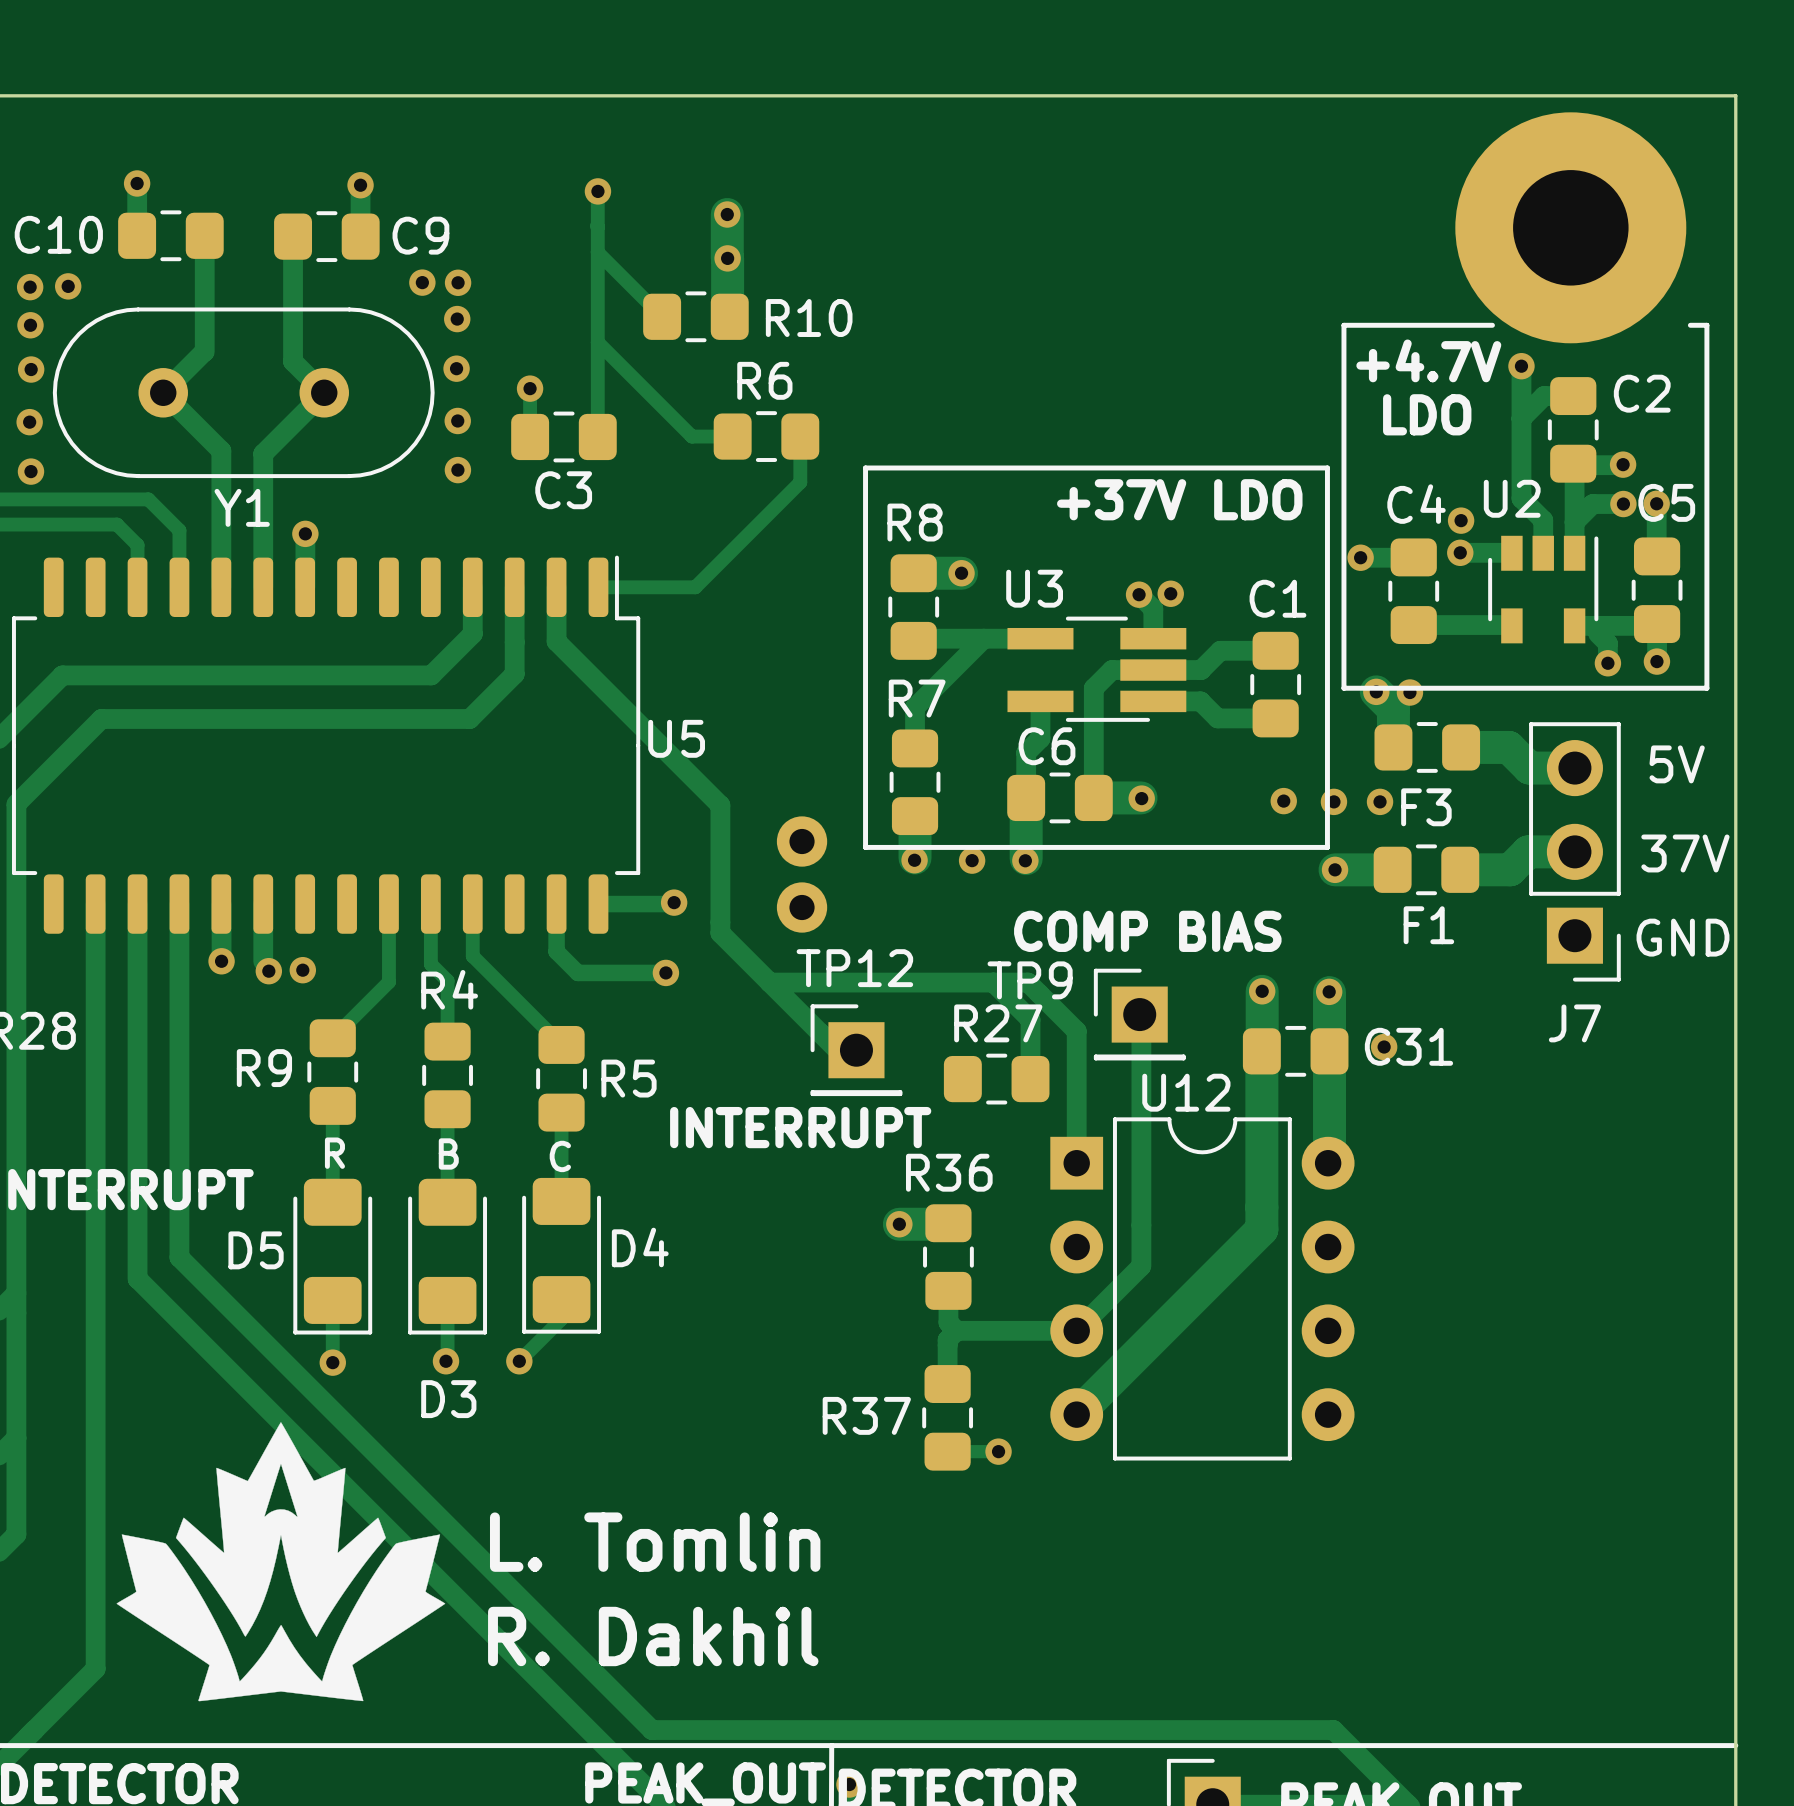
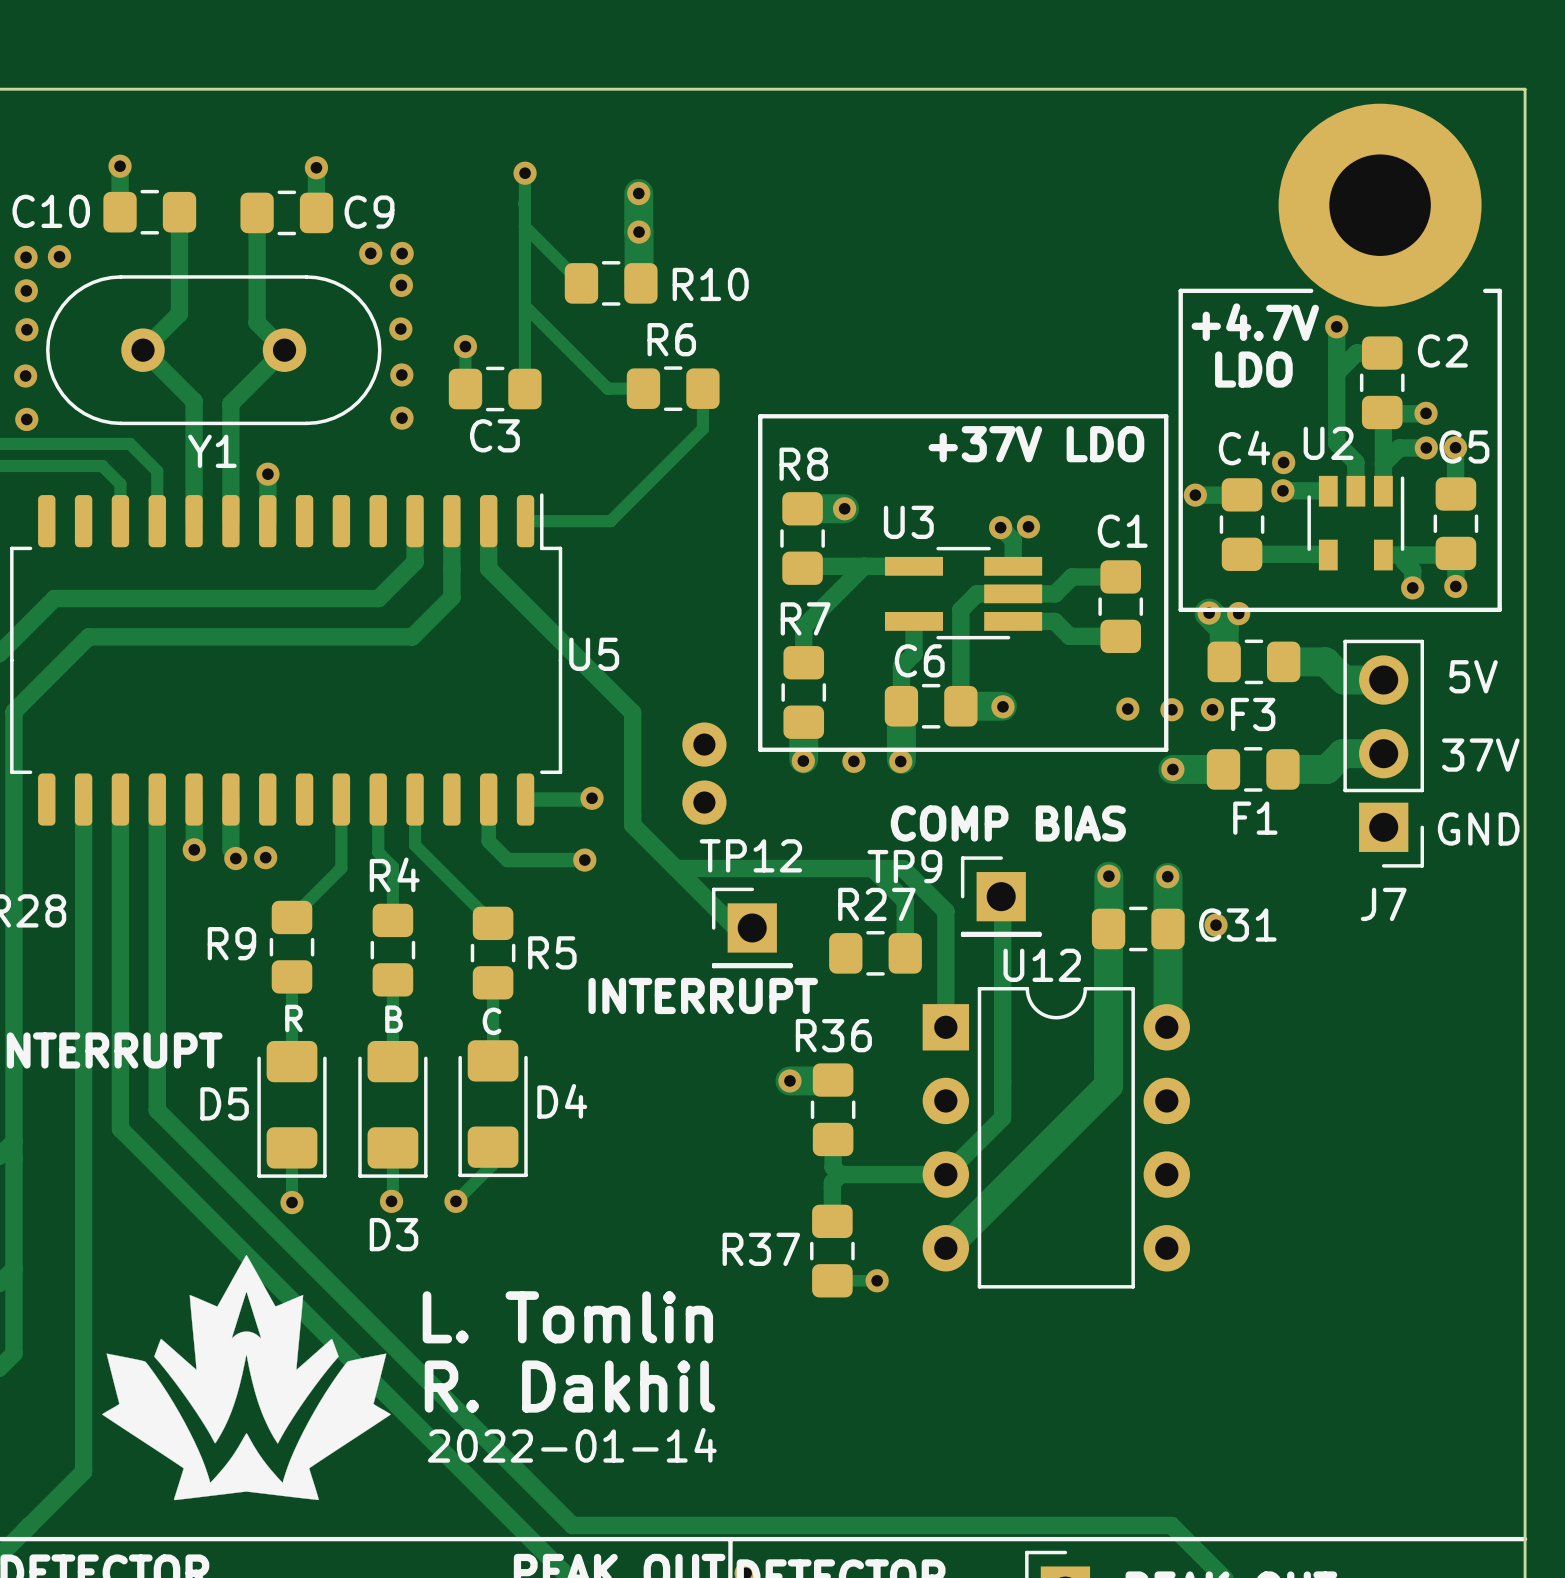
text position: L. Tomlin (655, 1542) -> L. Tomlin (567, 1317)
text: none -> R. Dakhil (569, 1386)
text: R. Dakhil (653, 1636) -> 2022-01-14 (572, 1445)

